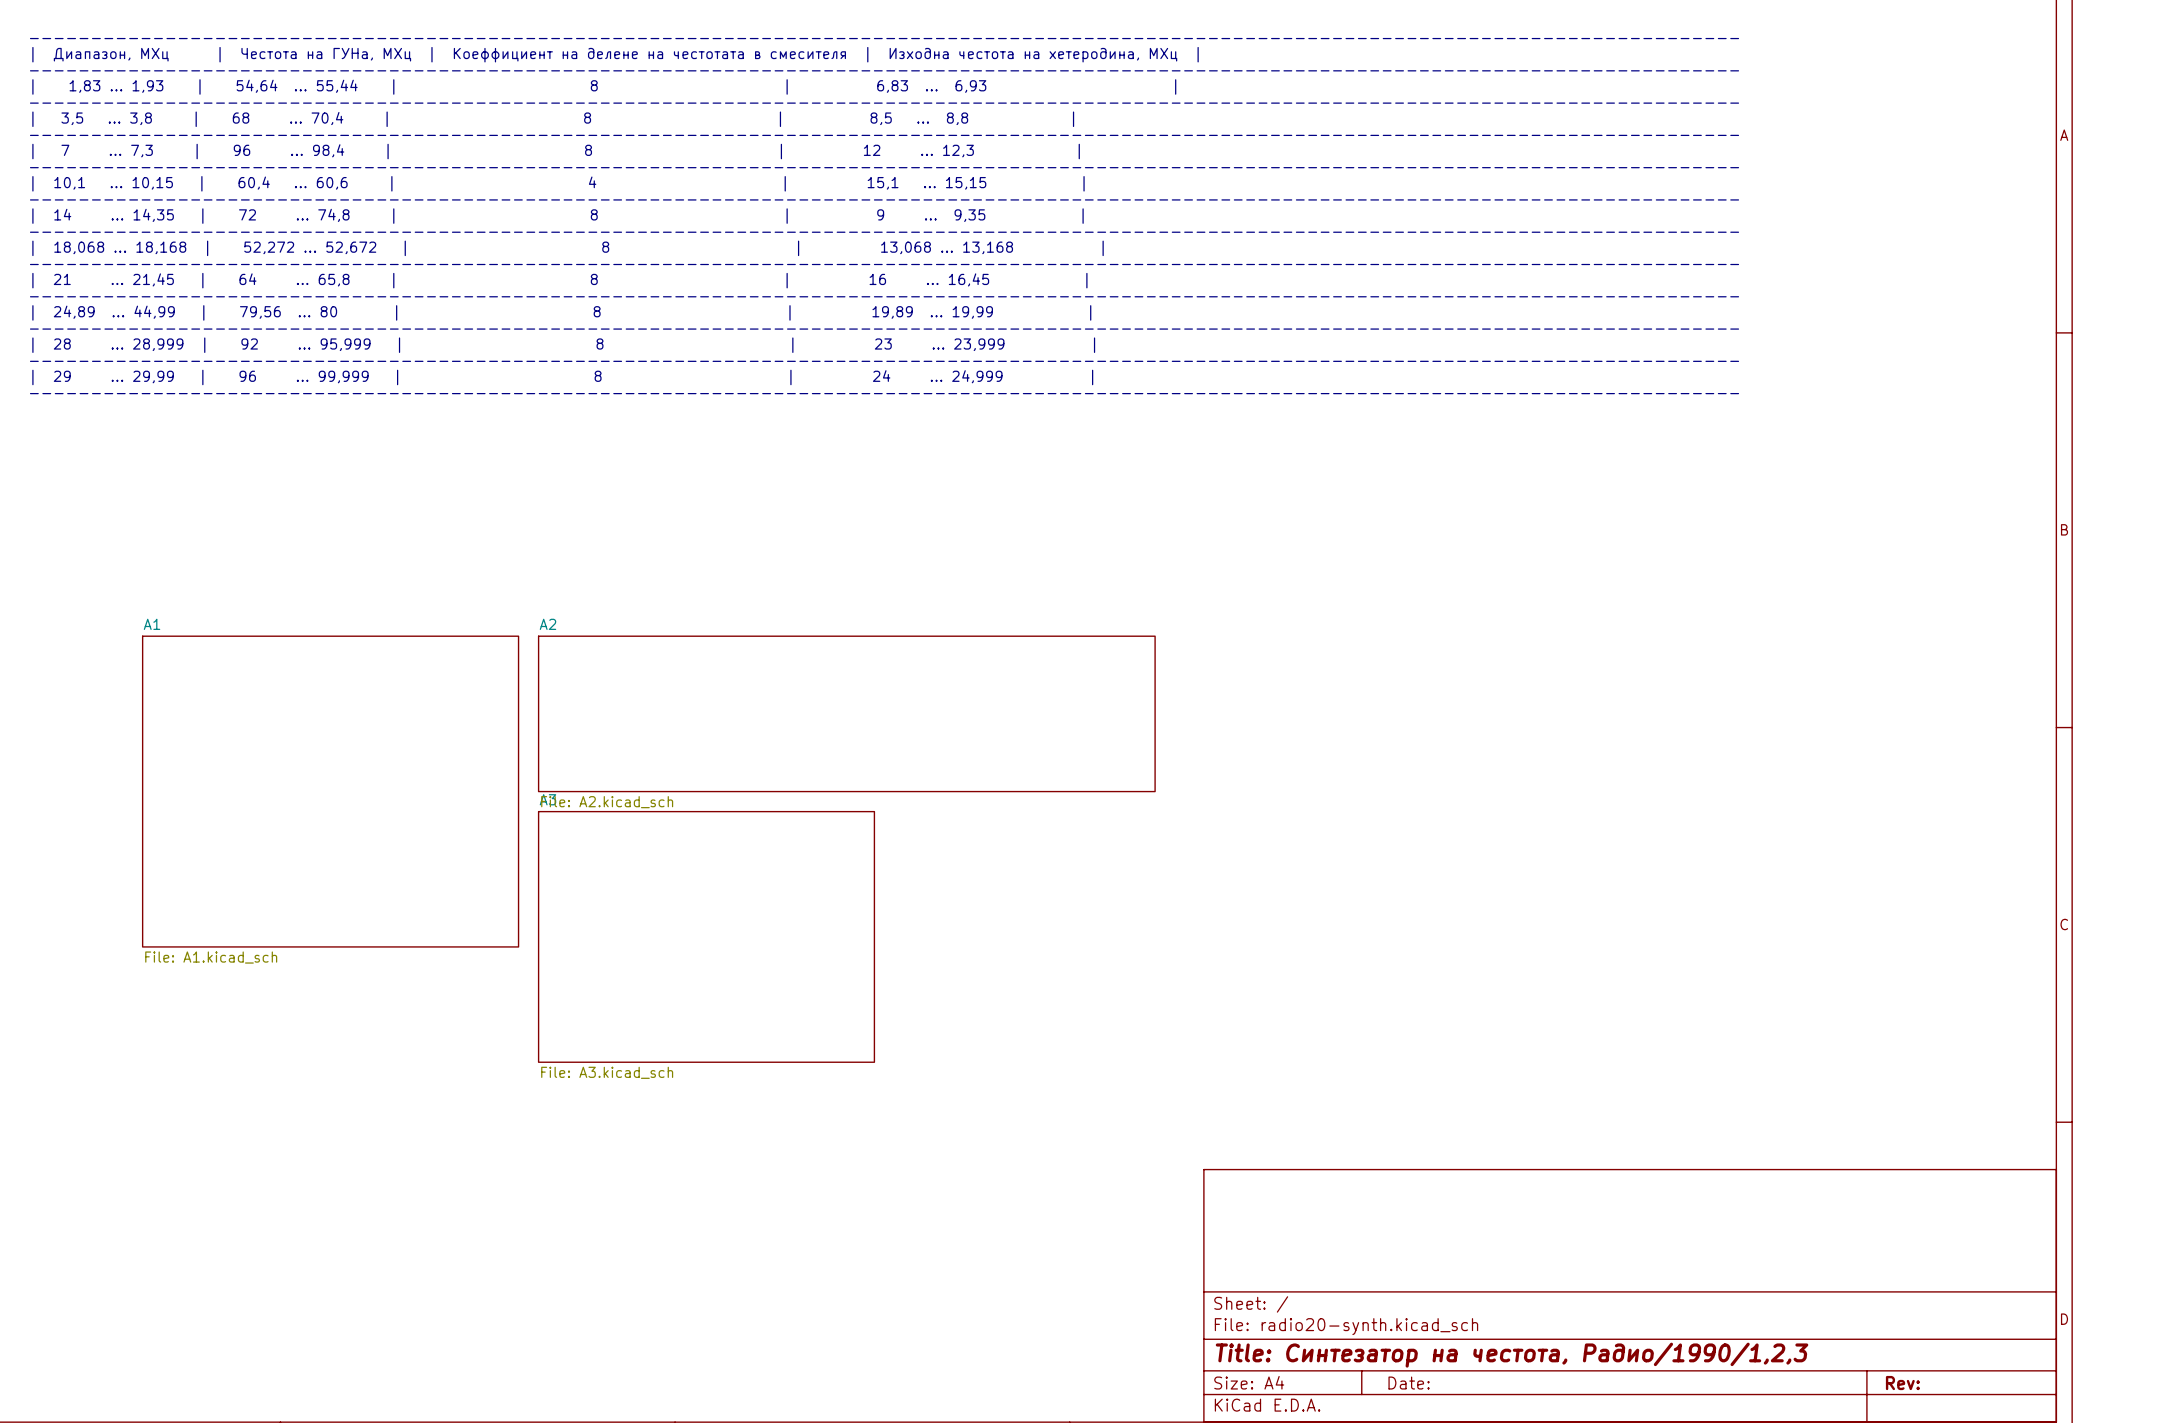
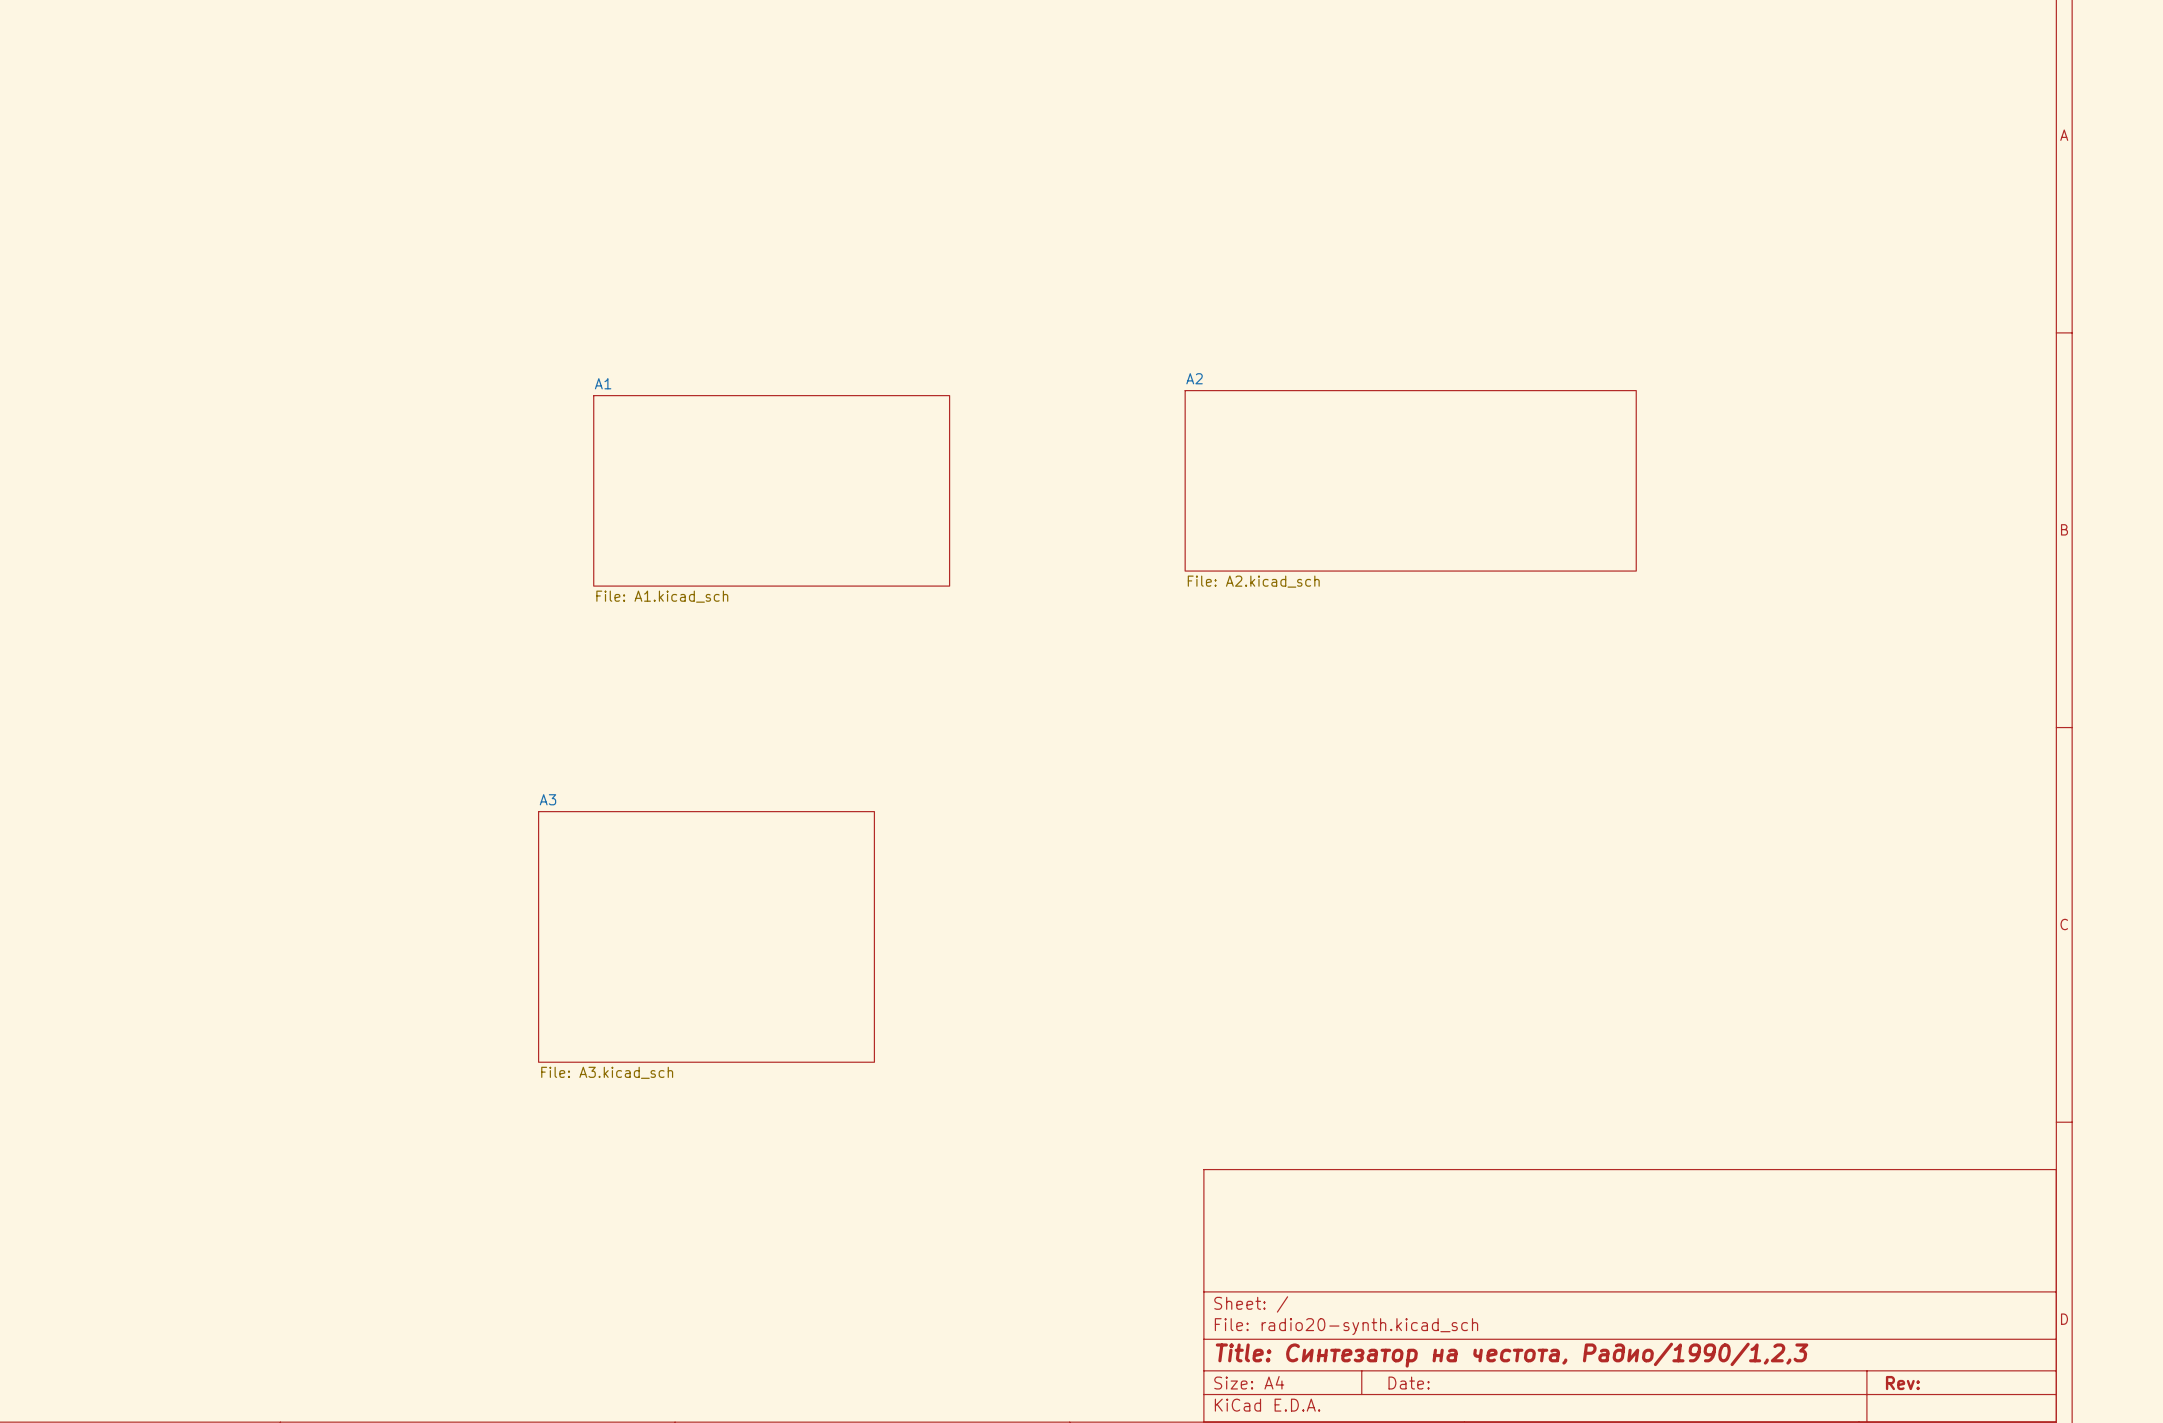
text: ------------------------------------------------------------------------------------------------------------------------------------------ (884, 38) -> none
text: | Диапазон, МХц | Честота на ГУНа, МХц | Коеффициент на делене на честотата в смесителя | Изходна честота на хетеродина, МХц | (615, 54) -> none
text: ------------------------------------------------------------------------------------------------------------------------------------------ (884, 70) -> none
text: | 1,83 ... 1,93 | 54,64 ... 55,44 | 8 | 6,83 ... 6,93 | (604, 86) -> none
text: ------------------------------------------------------------------------------------------------------------------------------------------ (884, 103) -> none
text: | 3,5 ... 3,8 | 68 ... 70,4 | 8 | 8,5 ... 8,8 | (553, 119) -> none
text: ------------------------------------------------------------------------------------------------------------------------------------------ (884, 135) -> none
text: | 7 ... 7,3 | 96 ... 98,4 | 8 | 12 ... 12,3 | (556, 151) -> none
text: ------------------------------------------------------------------------------------------------------------------------------------------ (884, 167) -> none
text: | 10,1 ... 10,15 | 60,4 ... 60,6 | 4 | 15,1 ... 15,15 | (558, 183) -> none
text: ------------------------------------------------------------------------------------------------------------------------------------------ (884, 199) -> none
text: | 14 ... 14,35 | 72 ... 74,8 | 8 | 9 ... 9,35 | (558, 216) -> none
text: ------------------------------------------------------------------------------------------------------------------------------------------ (884, 232) -> none
text: | 18,068 ... 18,168 | 52,272 ... 52,672 | 8 | 13,068 ... 13,168 | (568, 248) -> none
text: ------------------------------------------------------------------------------------------------------------------------------------------ (884, 264) -> none
text: | 21 ... 21,45 | 64 ... 65,8 | 8 | 16 ... 16,45 | (559, 280) -> none
text: ------------------------------------------------------------------------------------------------------------------------------------------ (884, 296) -> none
text: | 24,89 ... 44,99 | 79,56 ... 80 | 8 | 19,89 ... 19,99 | (561, 312) -> none
text: ------------------------------------------------------------------------------------------------------------------------------------------ (884, 329) -> none
text: | 28 ... 28,999 | 92 ... 95,999 | 8 | 23 ... 23,999 | (563, 345) -> none
text: ------------------------------------------------------------------------------------------------------------------------------------------ (884, 361) -> none
text: | 29 ... 29,99 | 96 ... 99,999 | 8 | 24 ... 24,999 | (562, 377) -> none
text: ------------------------------------------------------------------------------------------------------------------------------------------ (884, 393) -> none
sheet A1 name position: A1 (152, 624) -> A1 (603, 383)
sheet A2 name position: A2 (547, 624) -> A2 (1194, 378)
sheet A1 shape: [142, 635, 520, 948] -> [593, 395, 951, 587]
sheet A2 shape: [537, 635, 1156, 793] -> [1184, 390, 1637, 572]
sheet A2 value position: File: A2.kicad_sch (607, 802) -> File: A2.kicad_sch (1253, 581)
sheet A1 value position: File: A1.kicad_sch (211, 957) -> File: A1.kicad_sch (662, 596)

